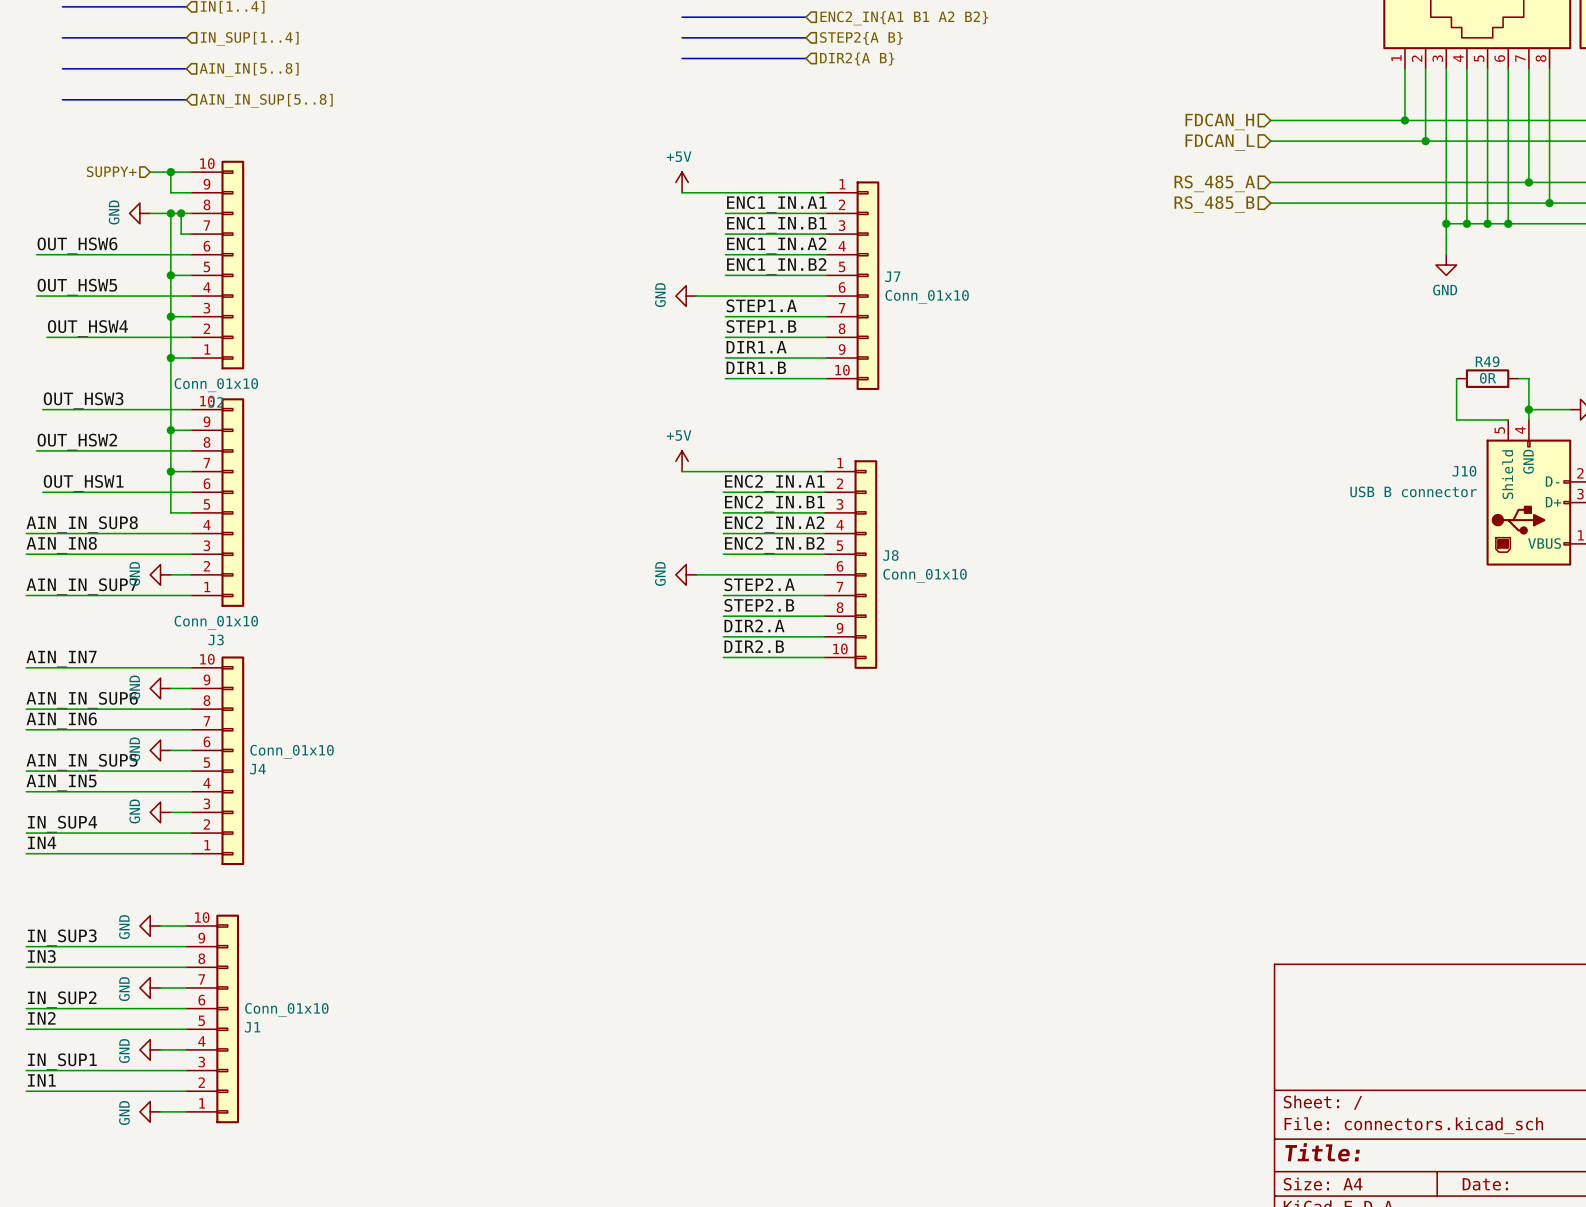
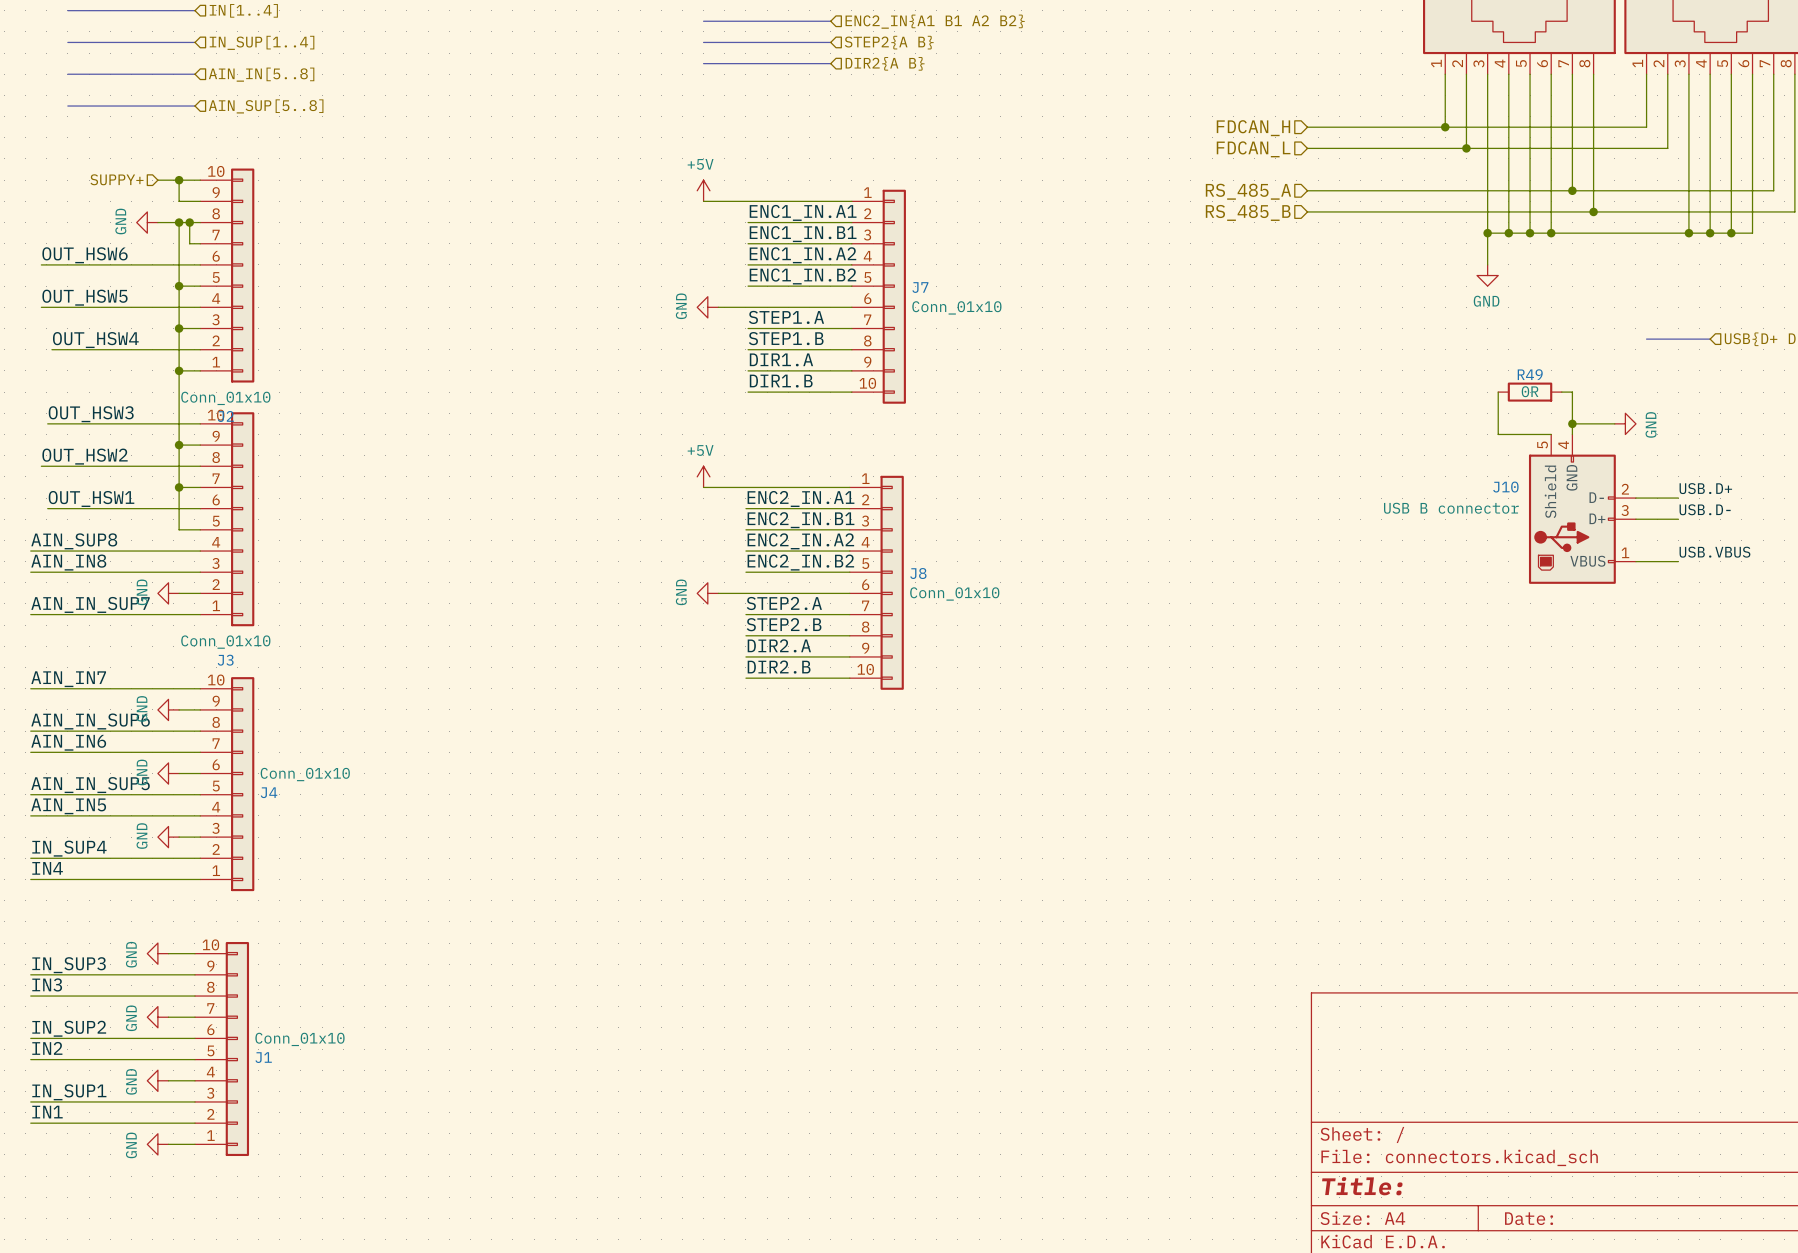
hierarchical label: AIN_IN_SUP[5..8] (266, 100) -> AIN_SUP[5..8] (266, 106)
label: AIN_IN_SUP8 (82, 524) -> AIN_SUP8 (74, 541)

